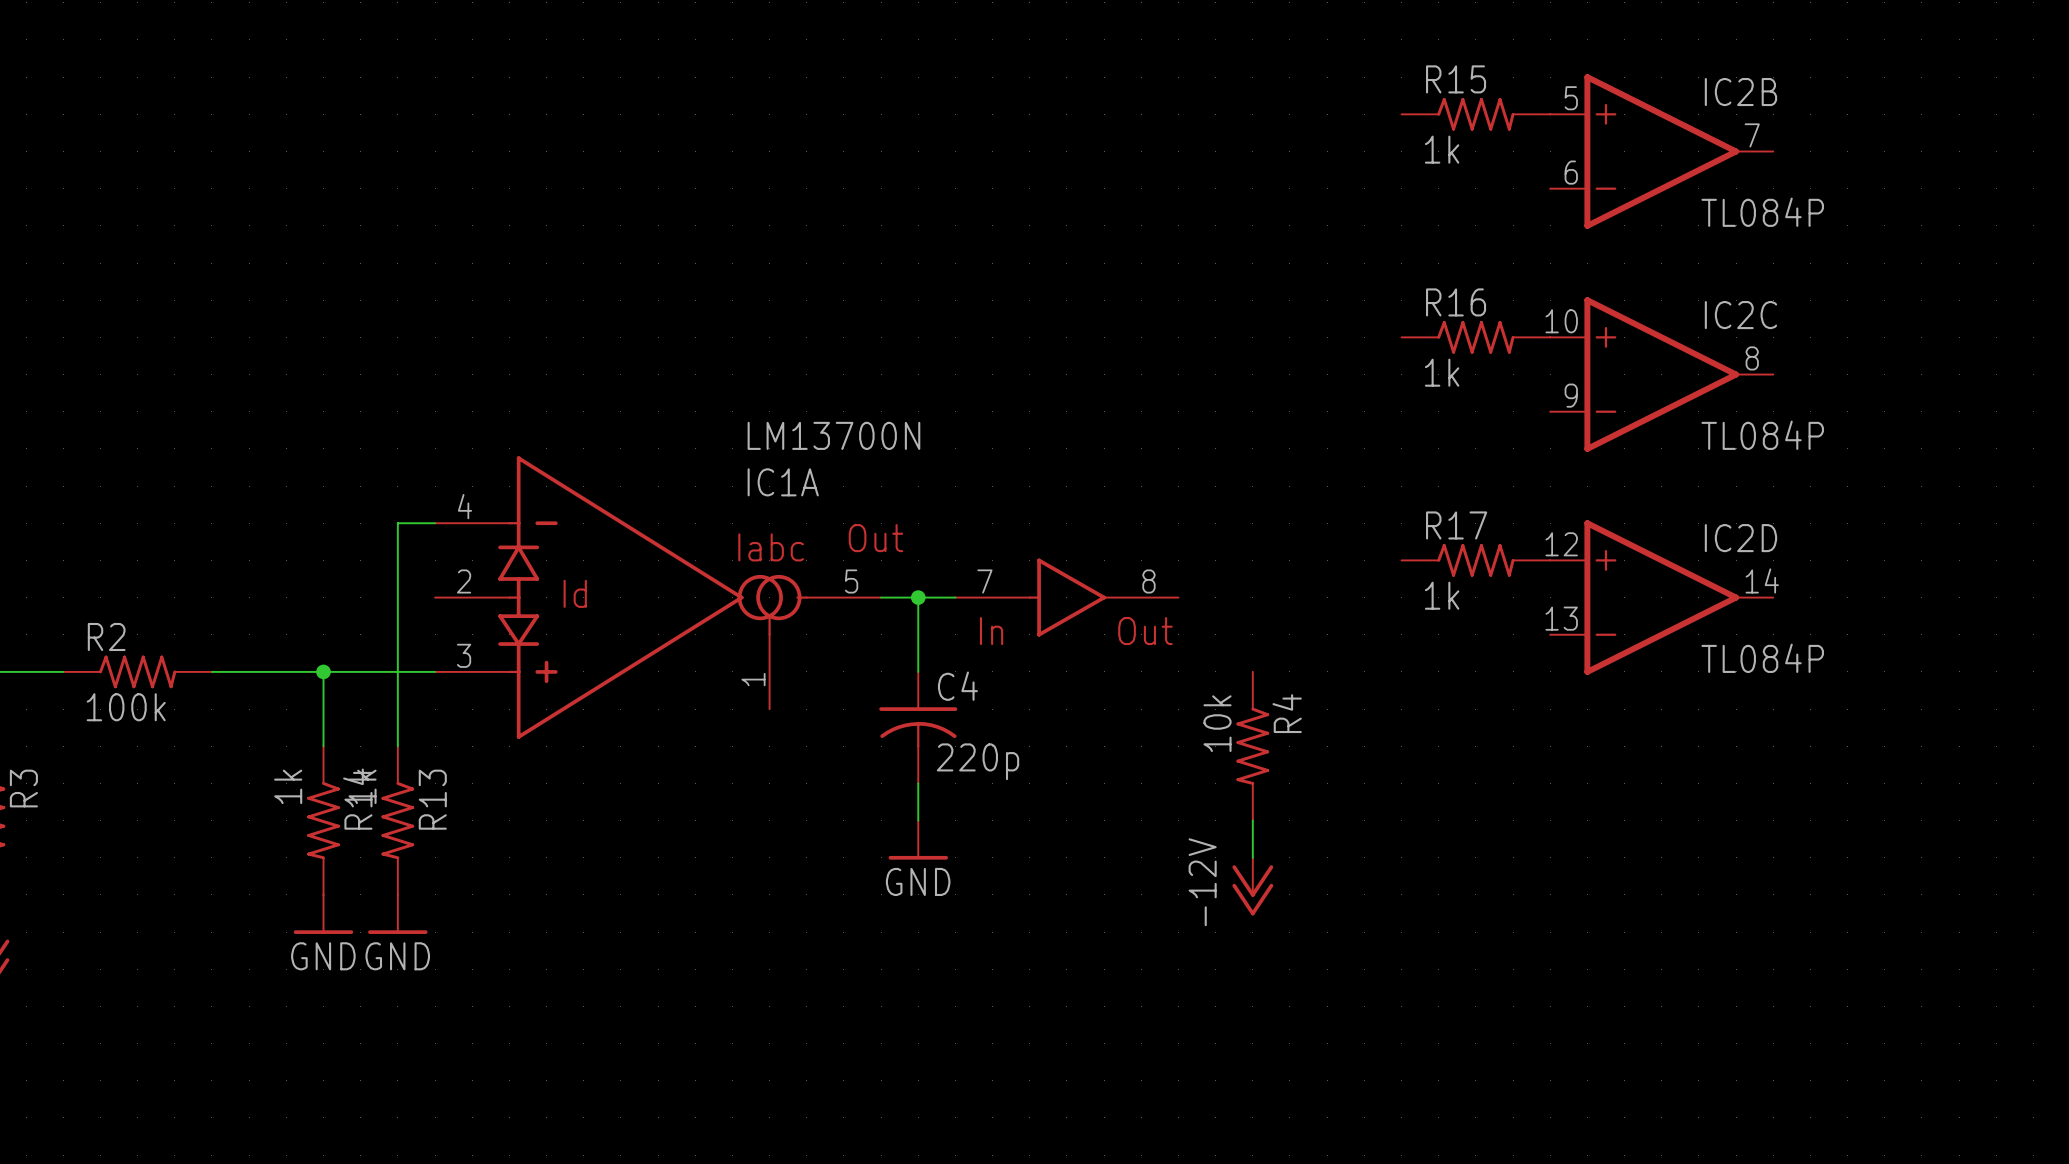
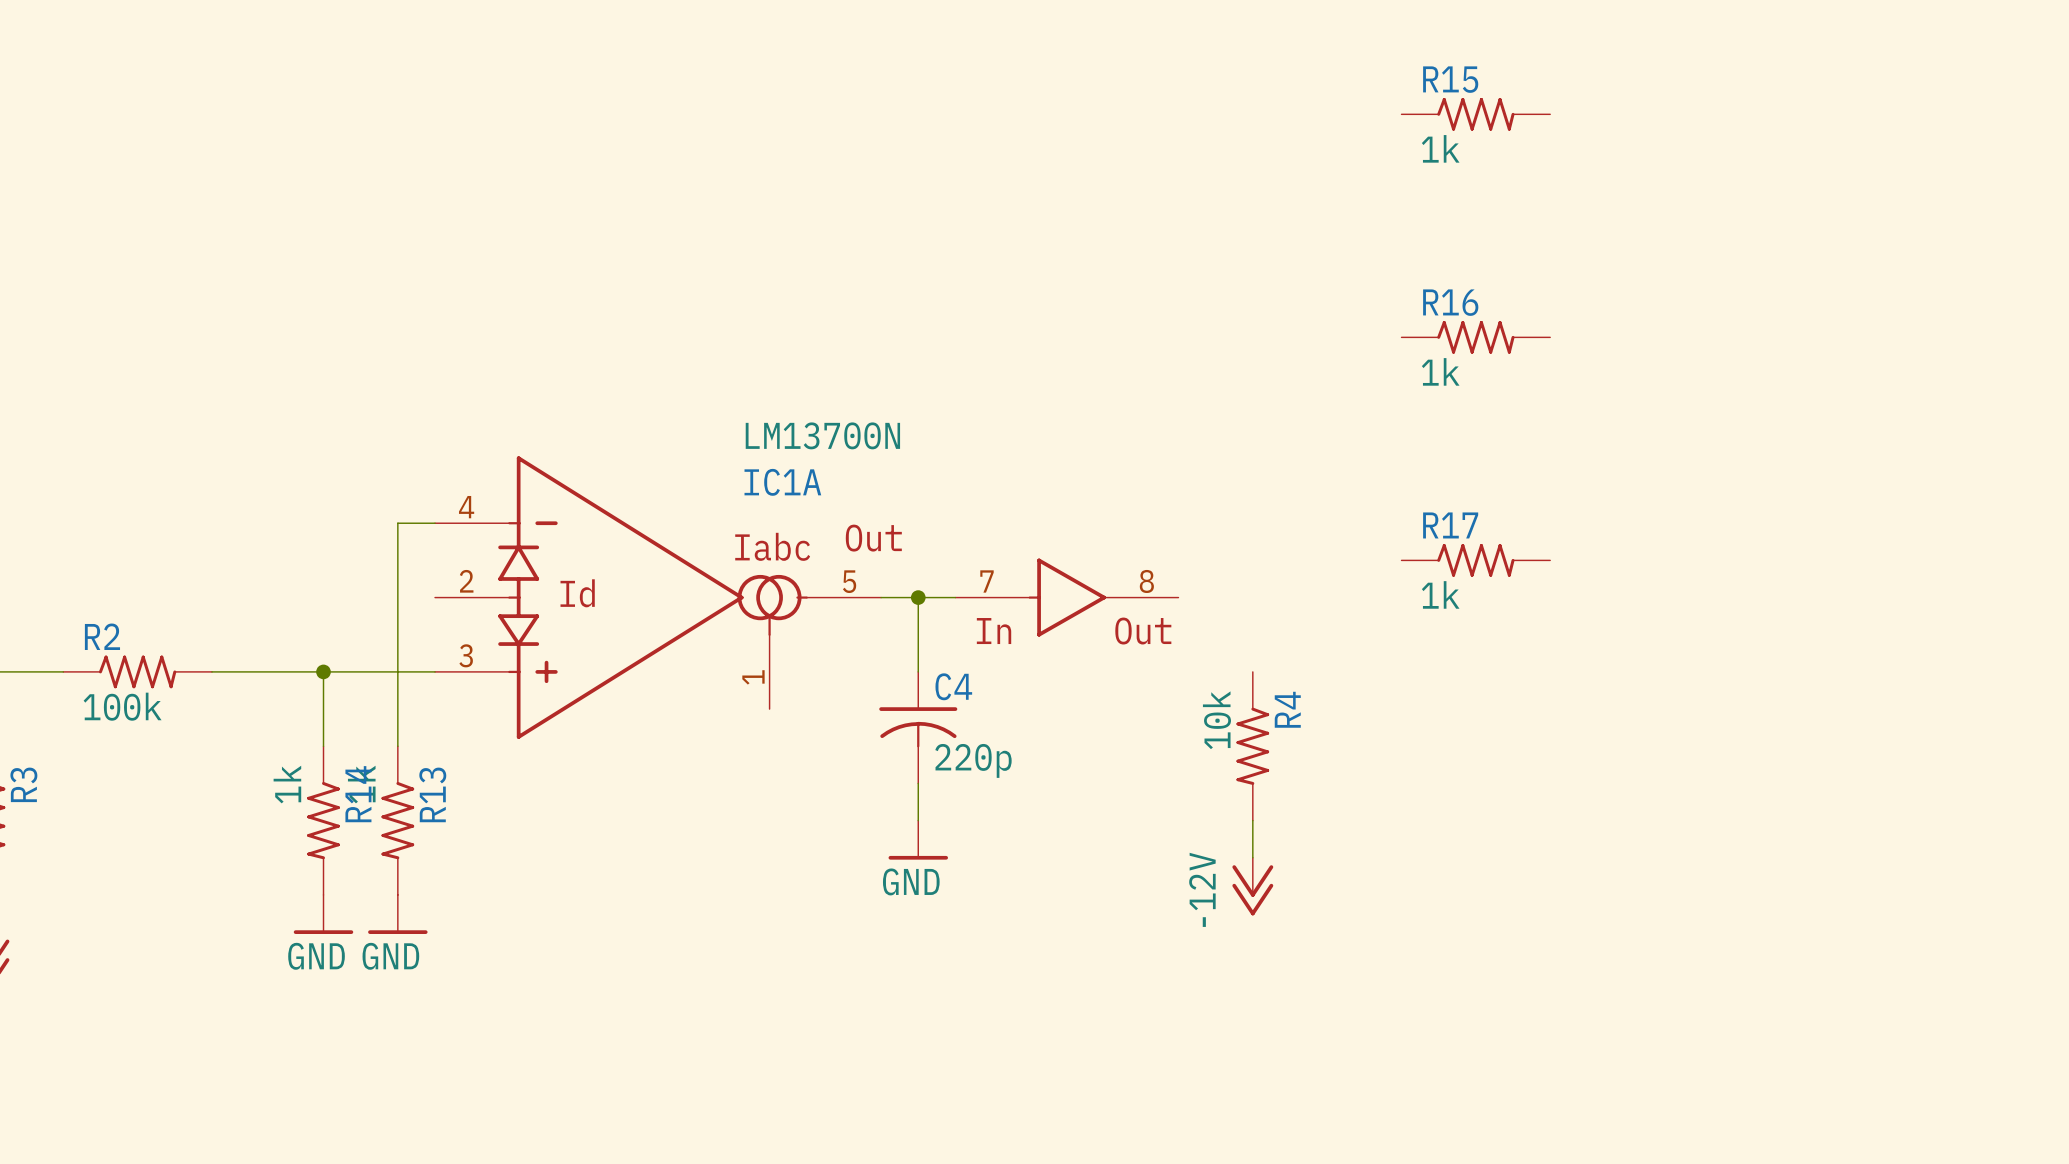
IC2B: TL084P (1661, 151) -> none
IC2C: TL084P (1661, 374) -> none
IC2D: TL084P (1661, 597) -> none

